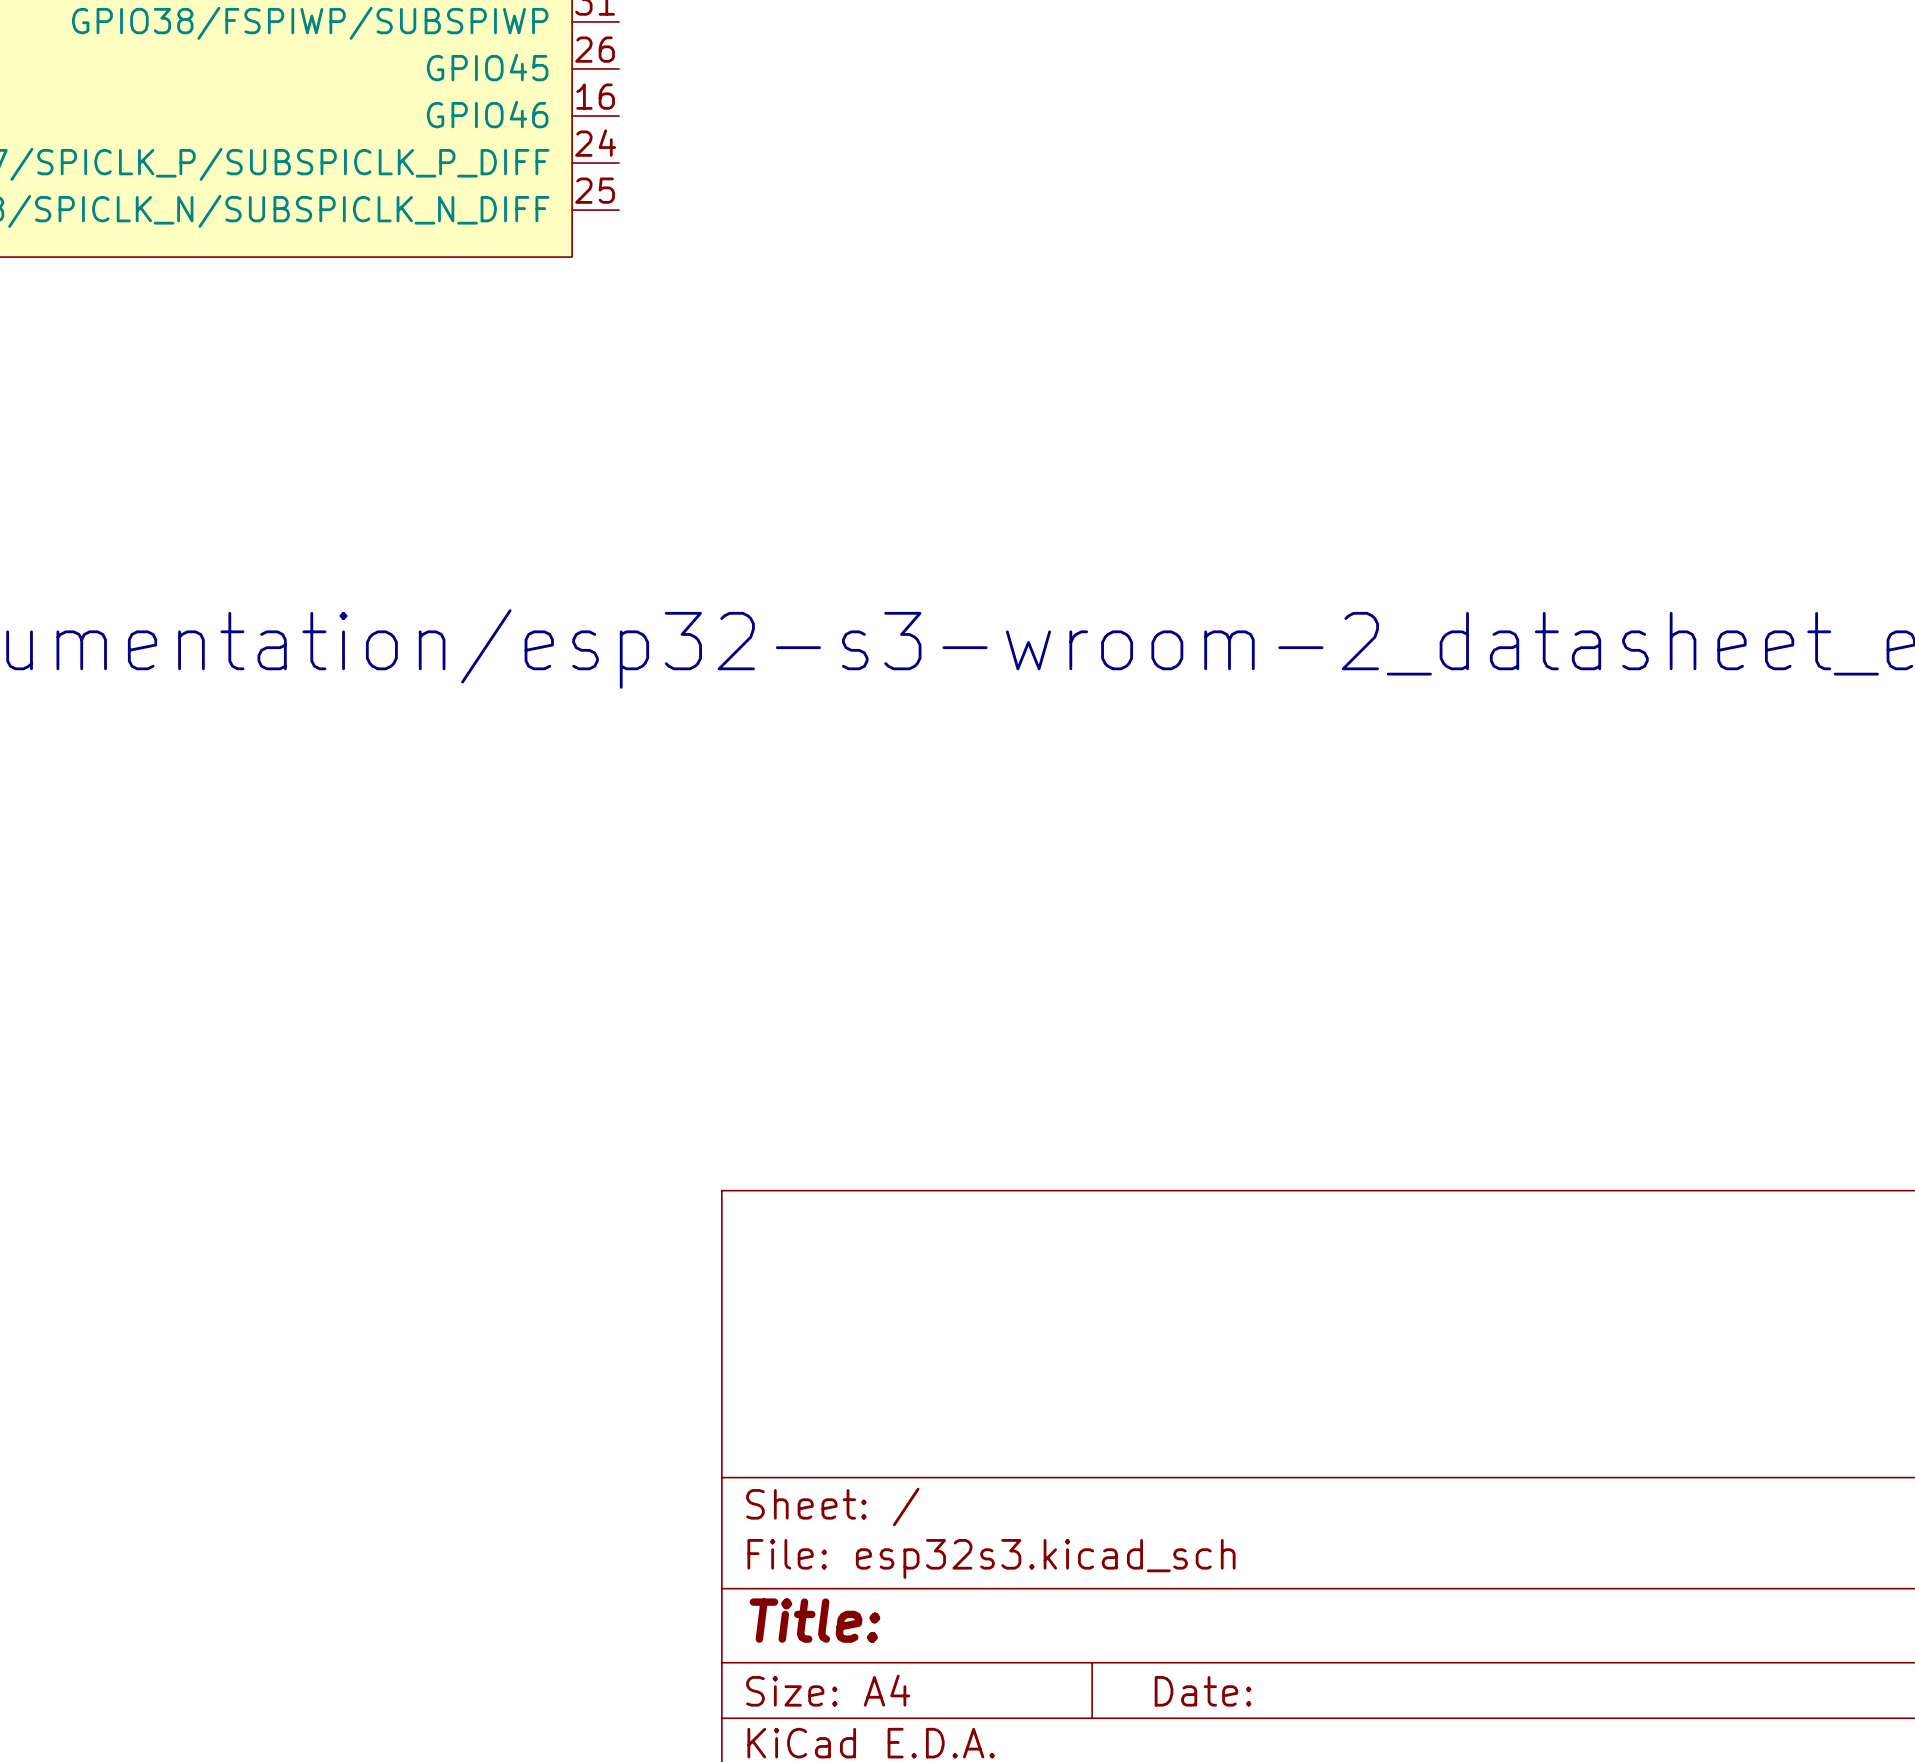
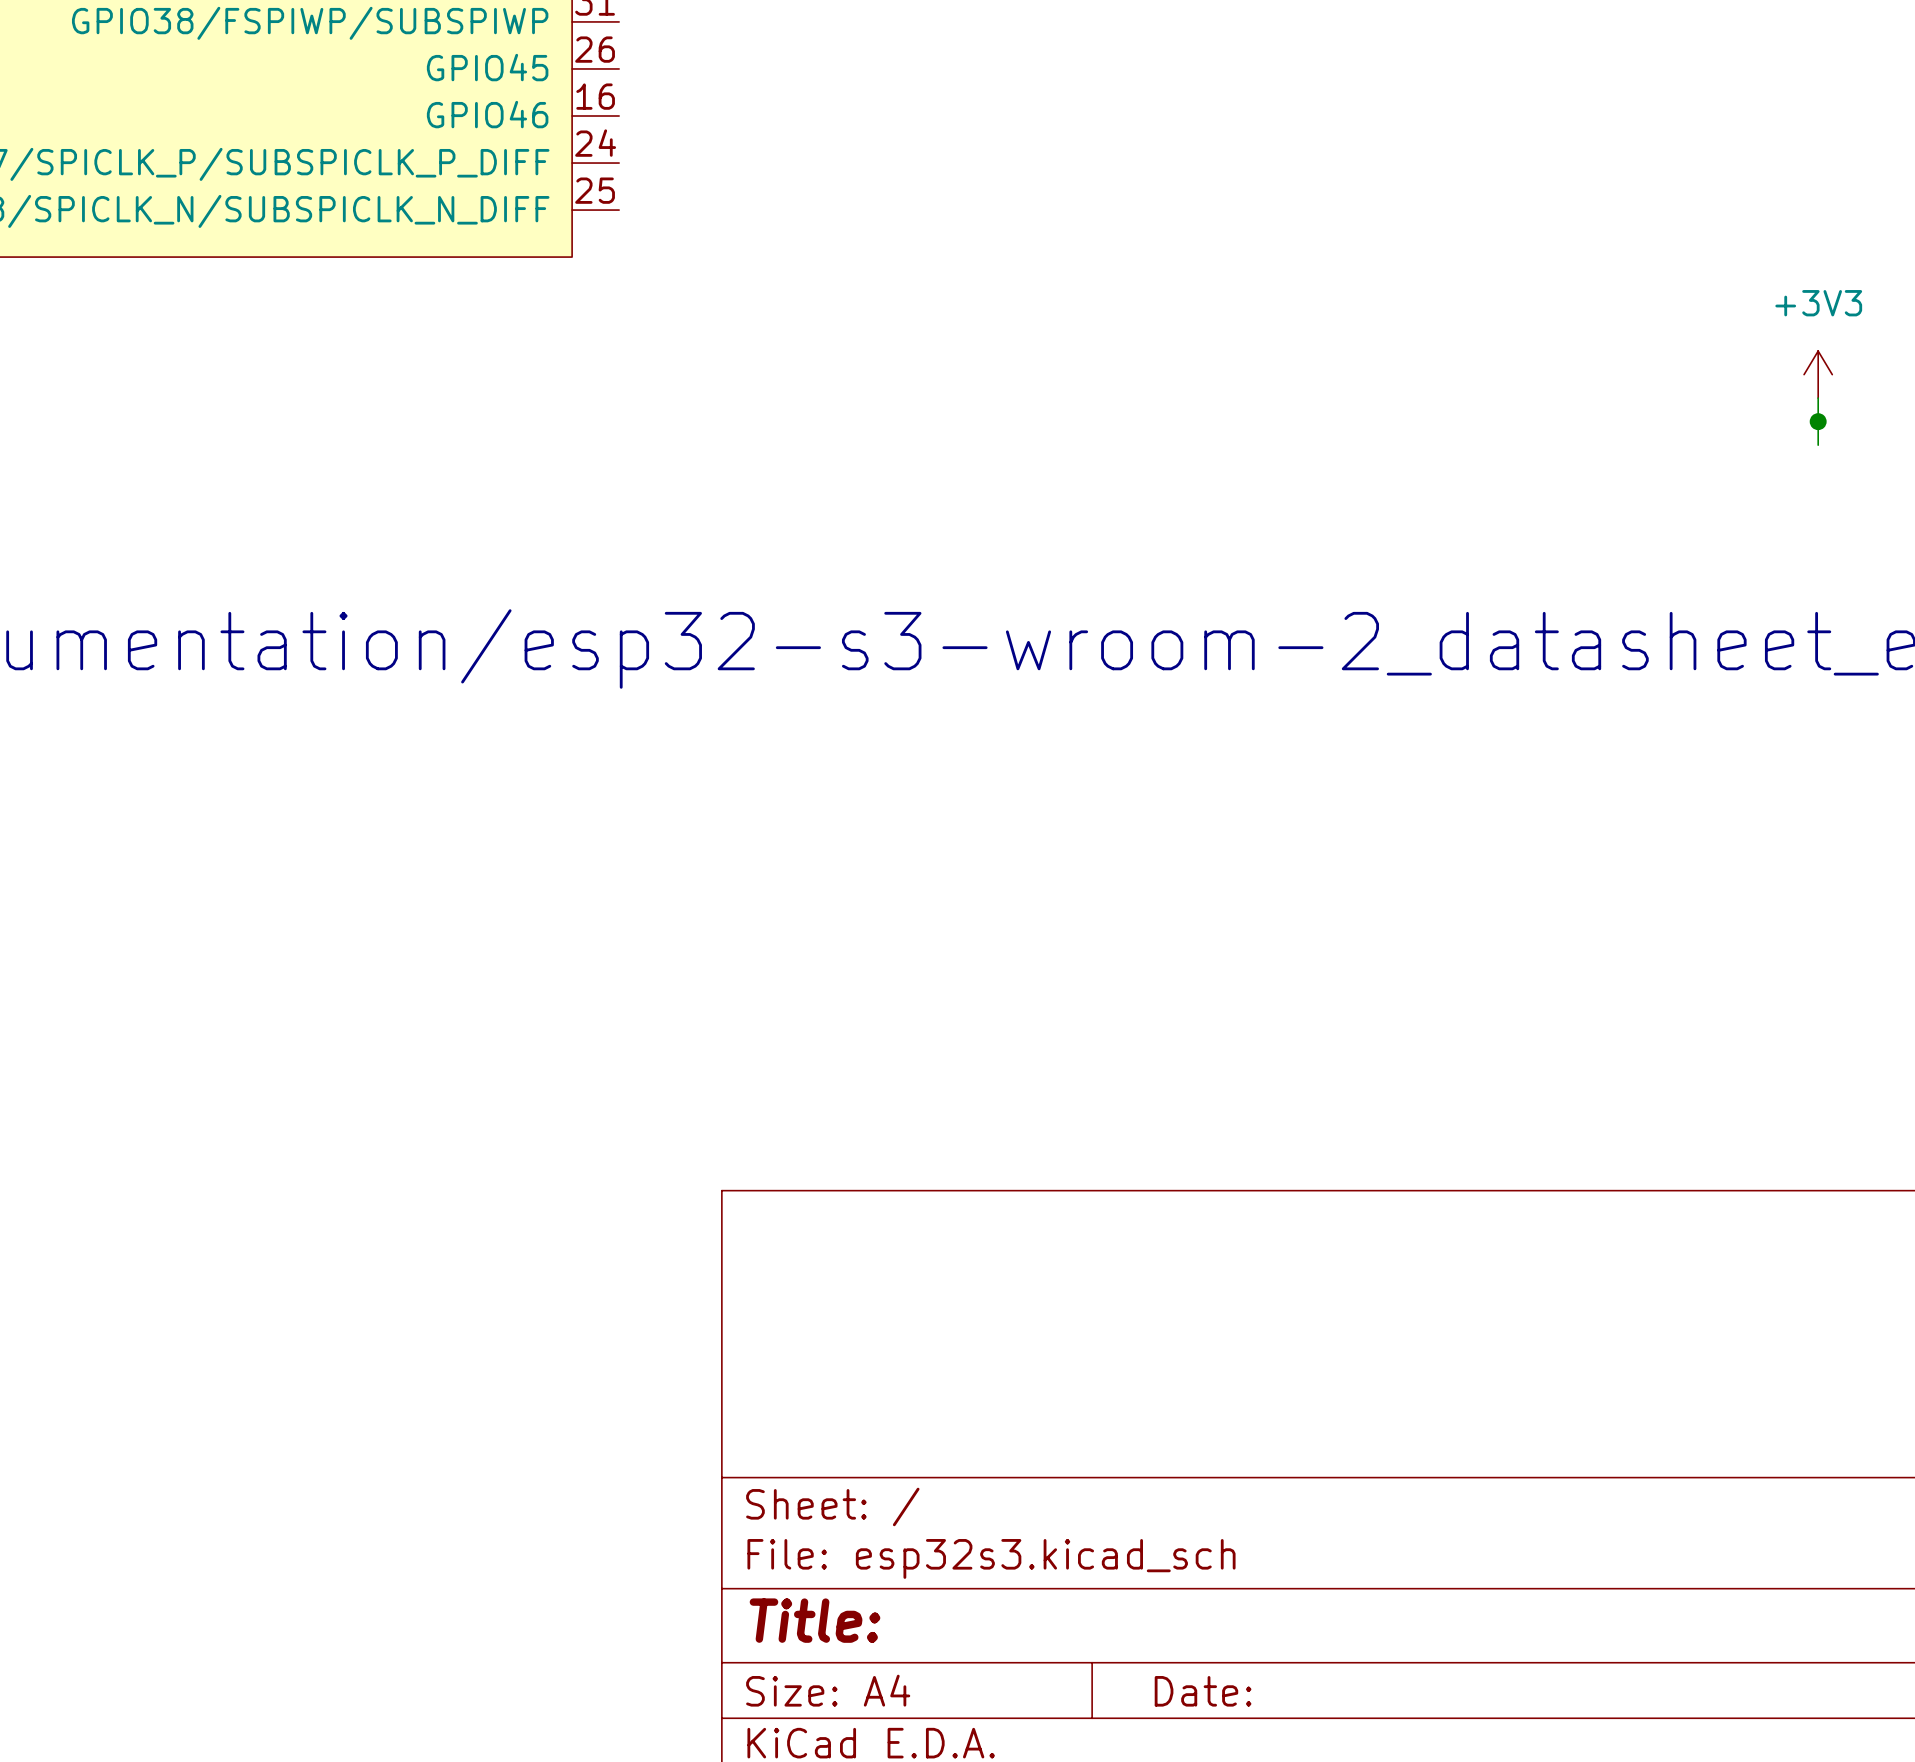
power symbol: none -> +3V3 (1818, 374)
wire: none -> (1818, 398) (1818, 445)
junction: none -> (1818, 421)

